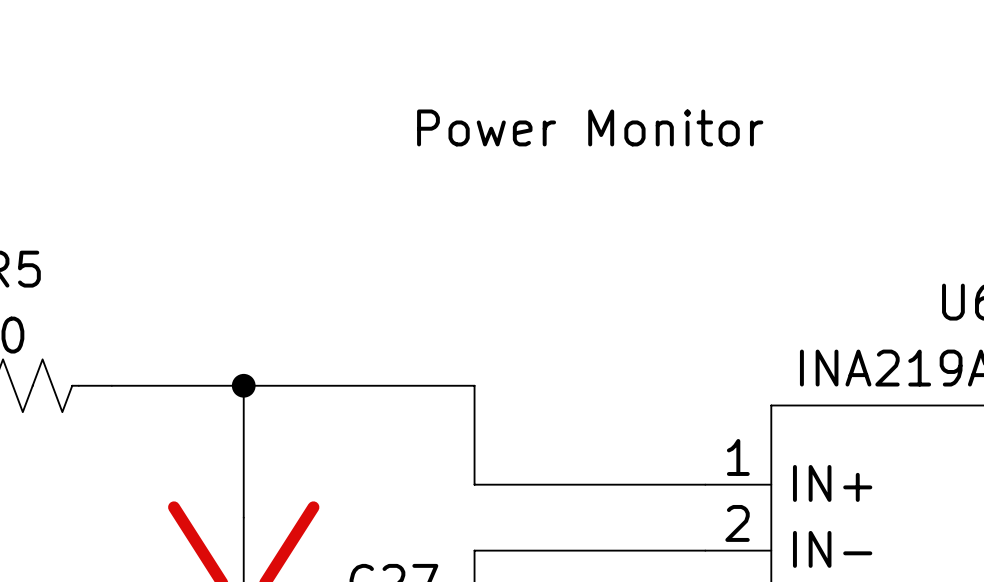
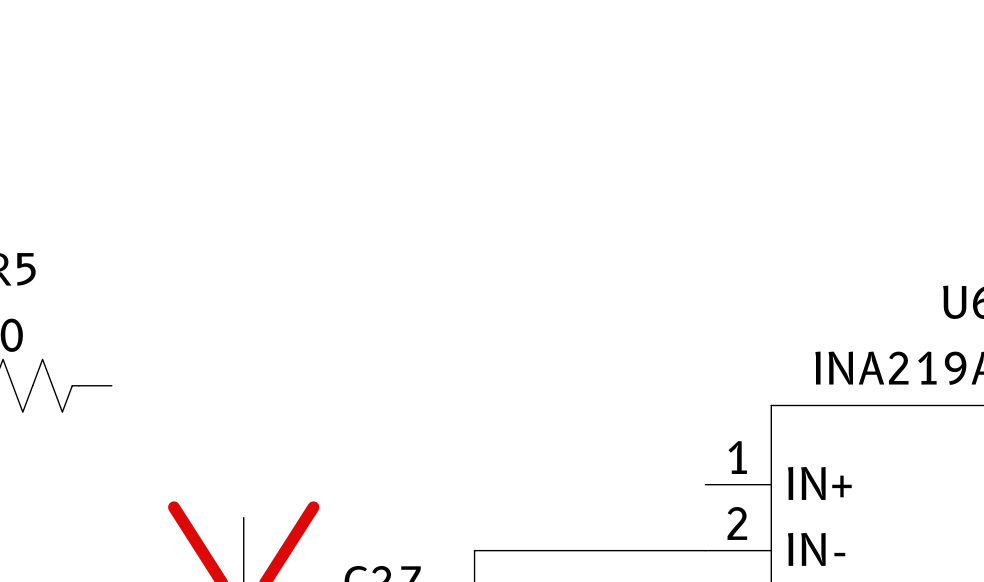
text: Power Monitor (590, 127) -> none
wire: (111, 385) (474, 385) (474, 484) (705, 484) -> none
wire: (243, 385) (243, 517) -> none
junction: (243, 385) -> none

